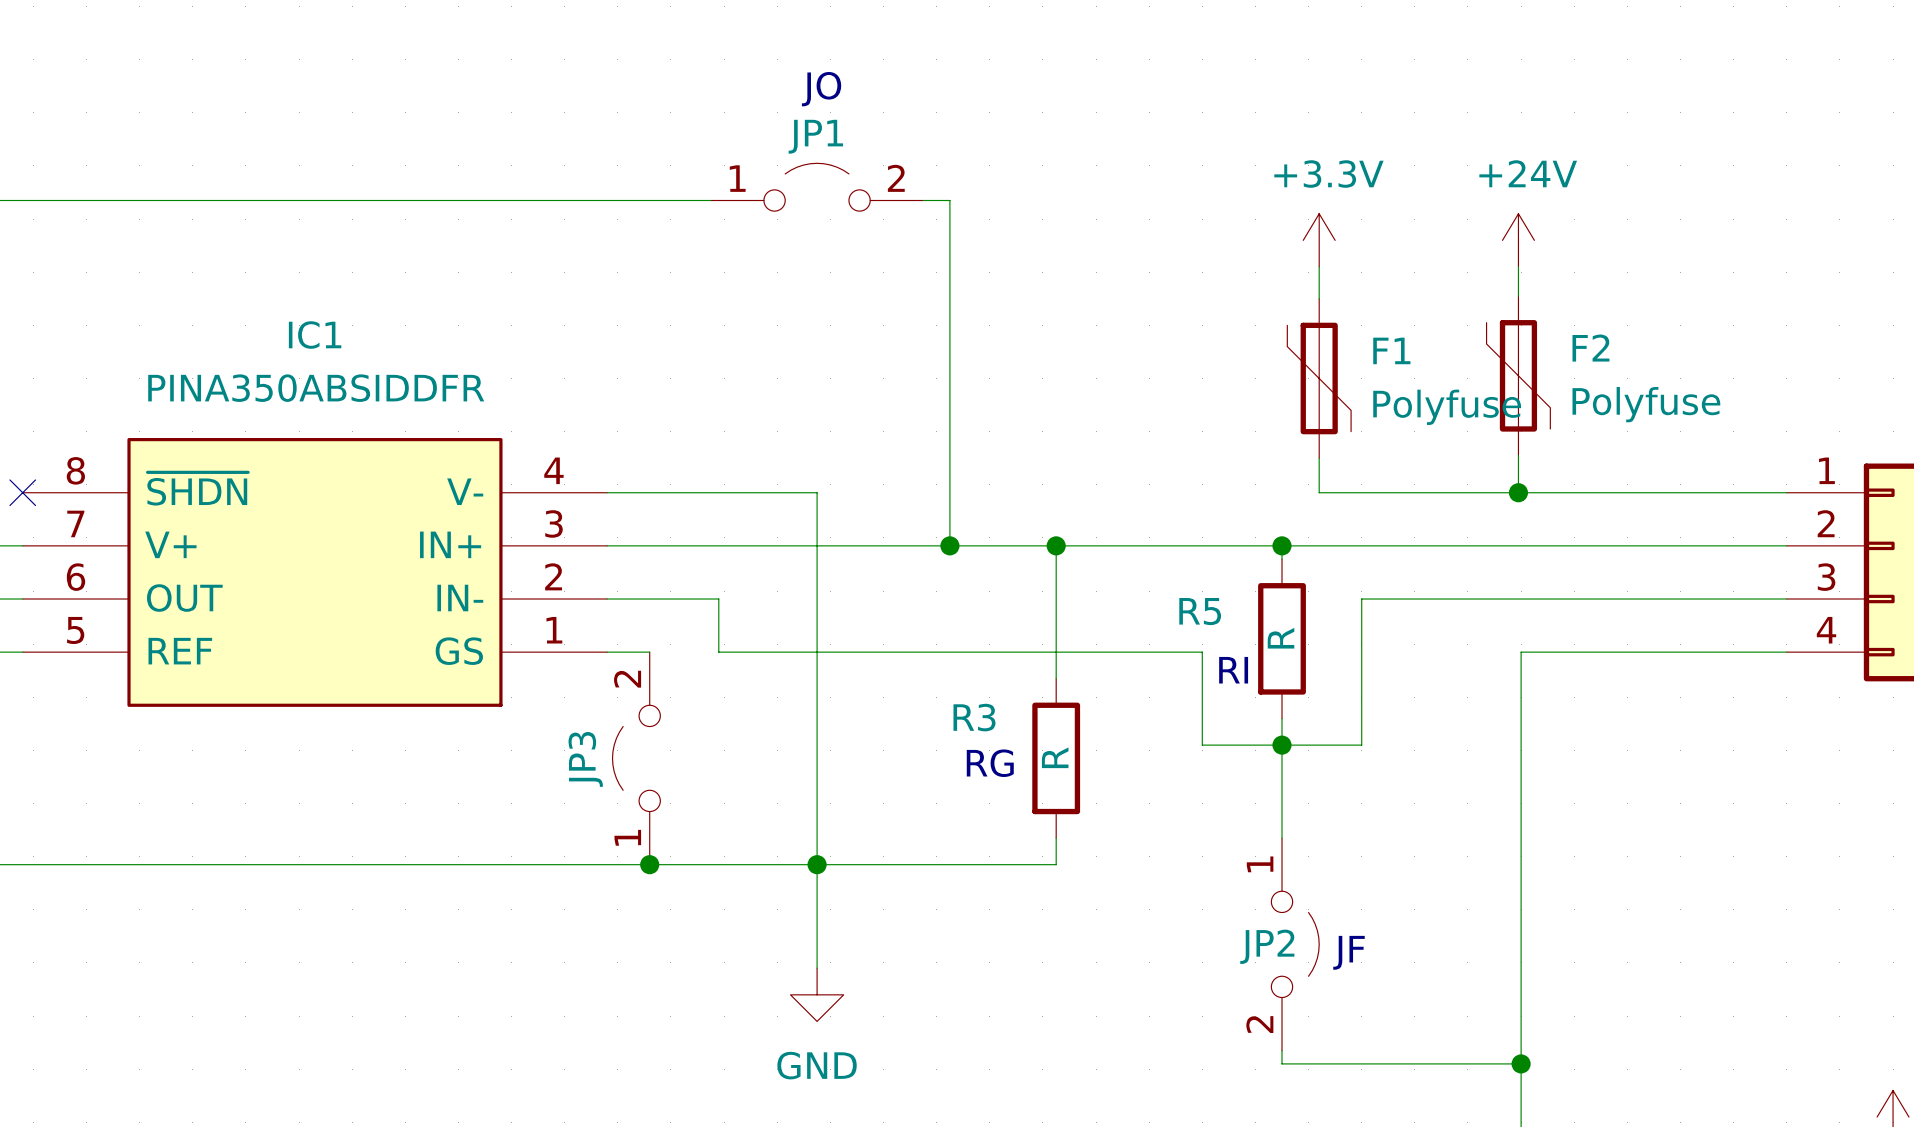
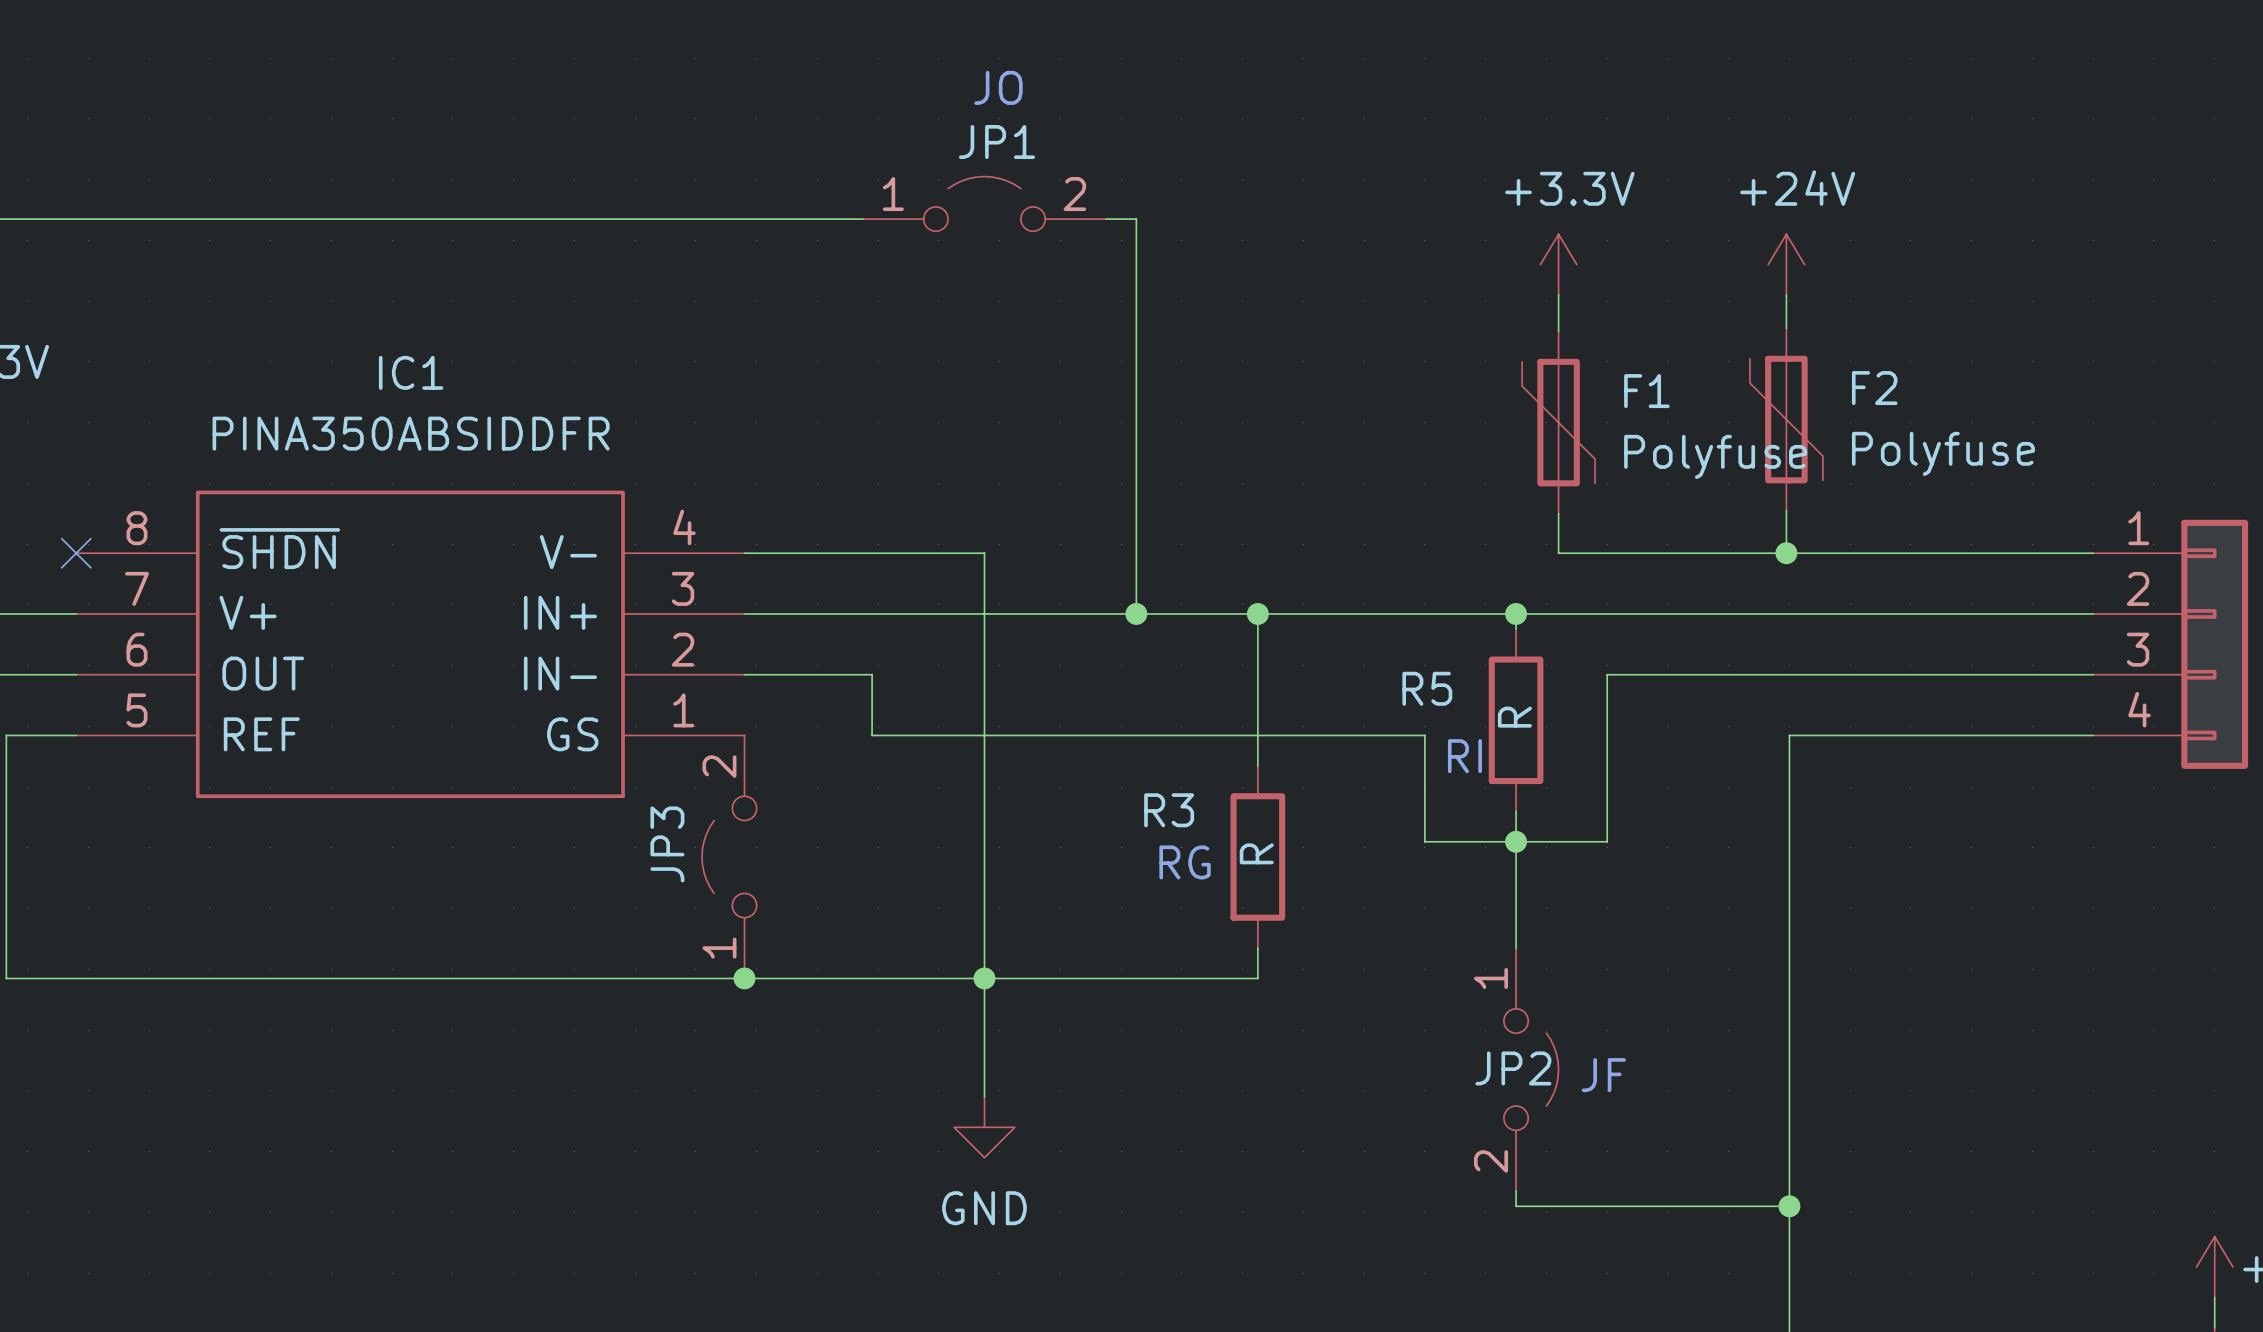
IC1 symbol: [22, 438, 608, 707] -> [76, 490, 745, 799]
wire: (607, 652) (649, 652) -> none
JP3 position: (636, 758) -> (729, 856)
junction position: (649, 864) -> (744, 978)

